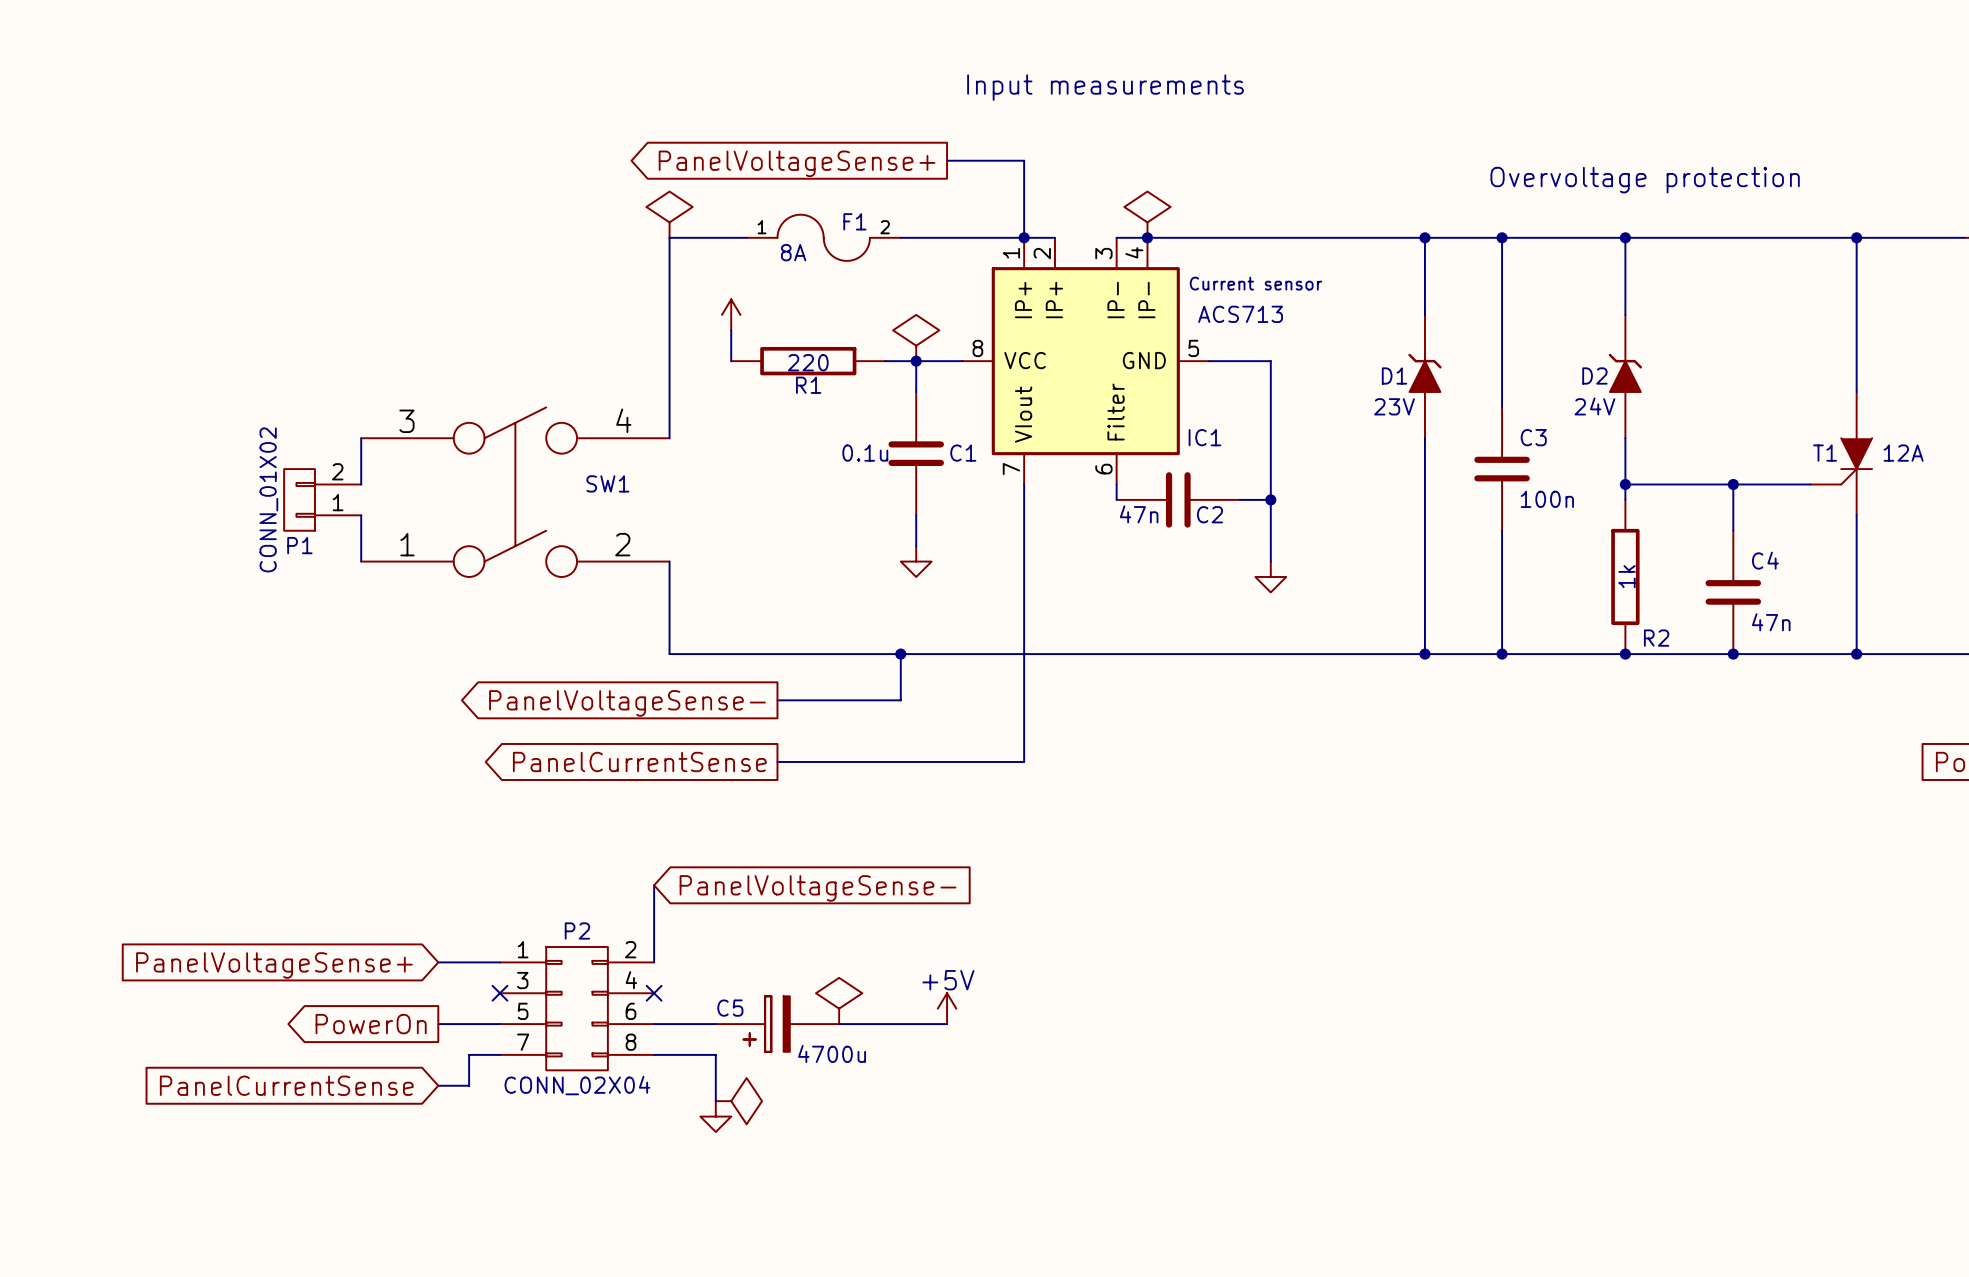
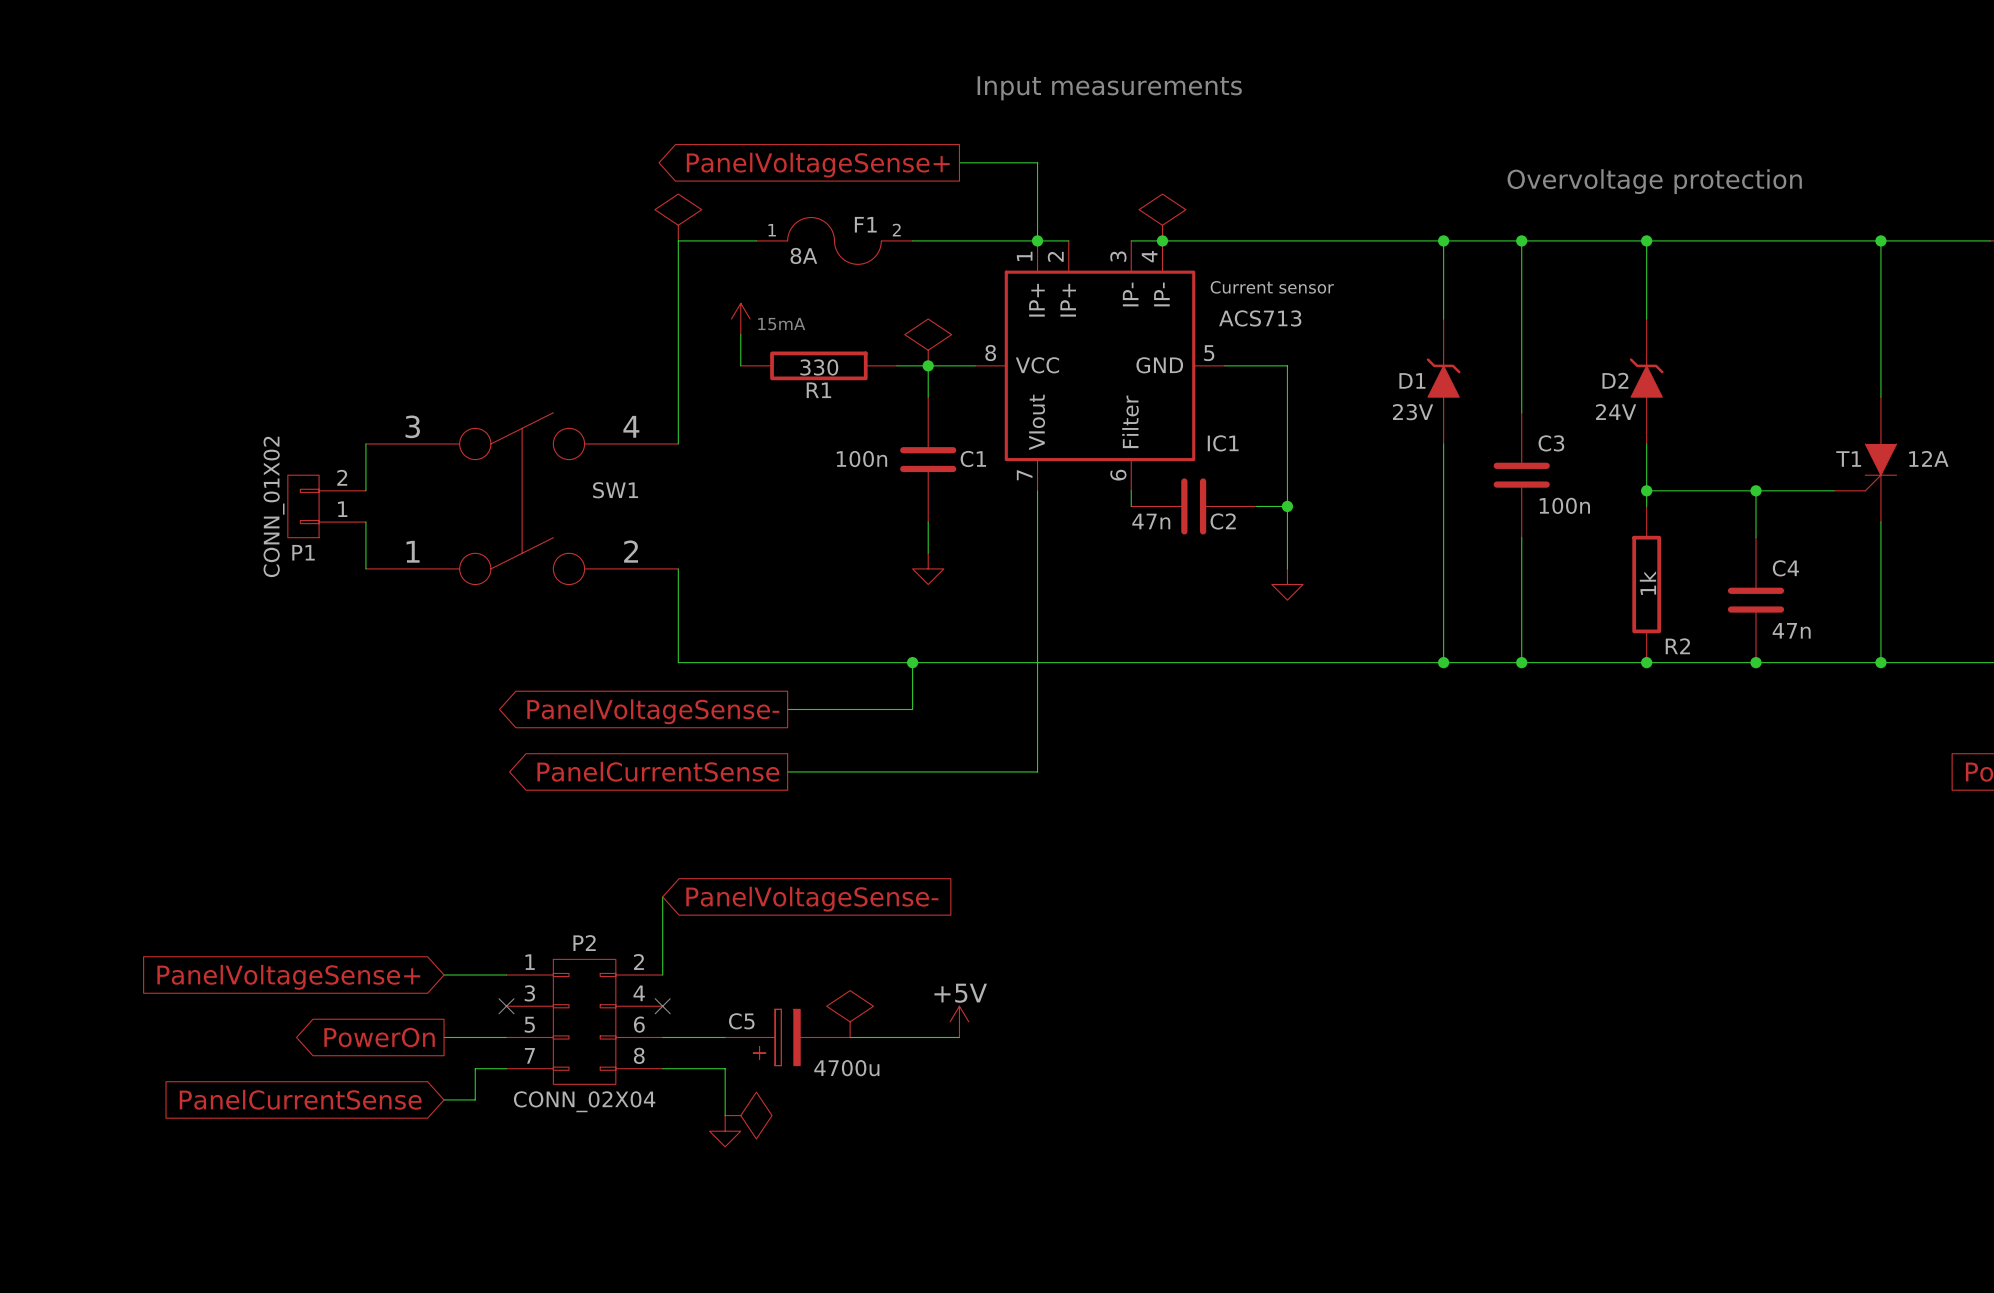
text: none -> 15mA (781, 324)
R1 value: 220 (808, 362) -> 330 (819, 367)
C1 value: 0.1u (865, 453) -> 100n (862, 459)

